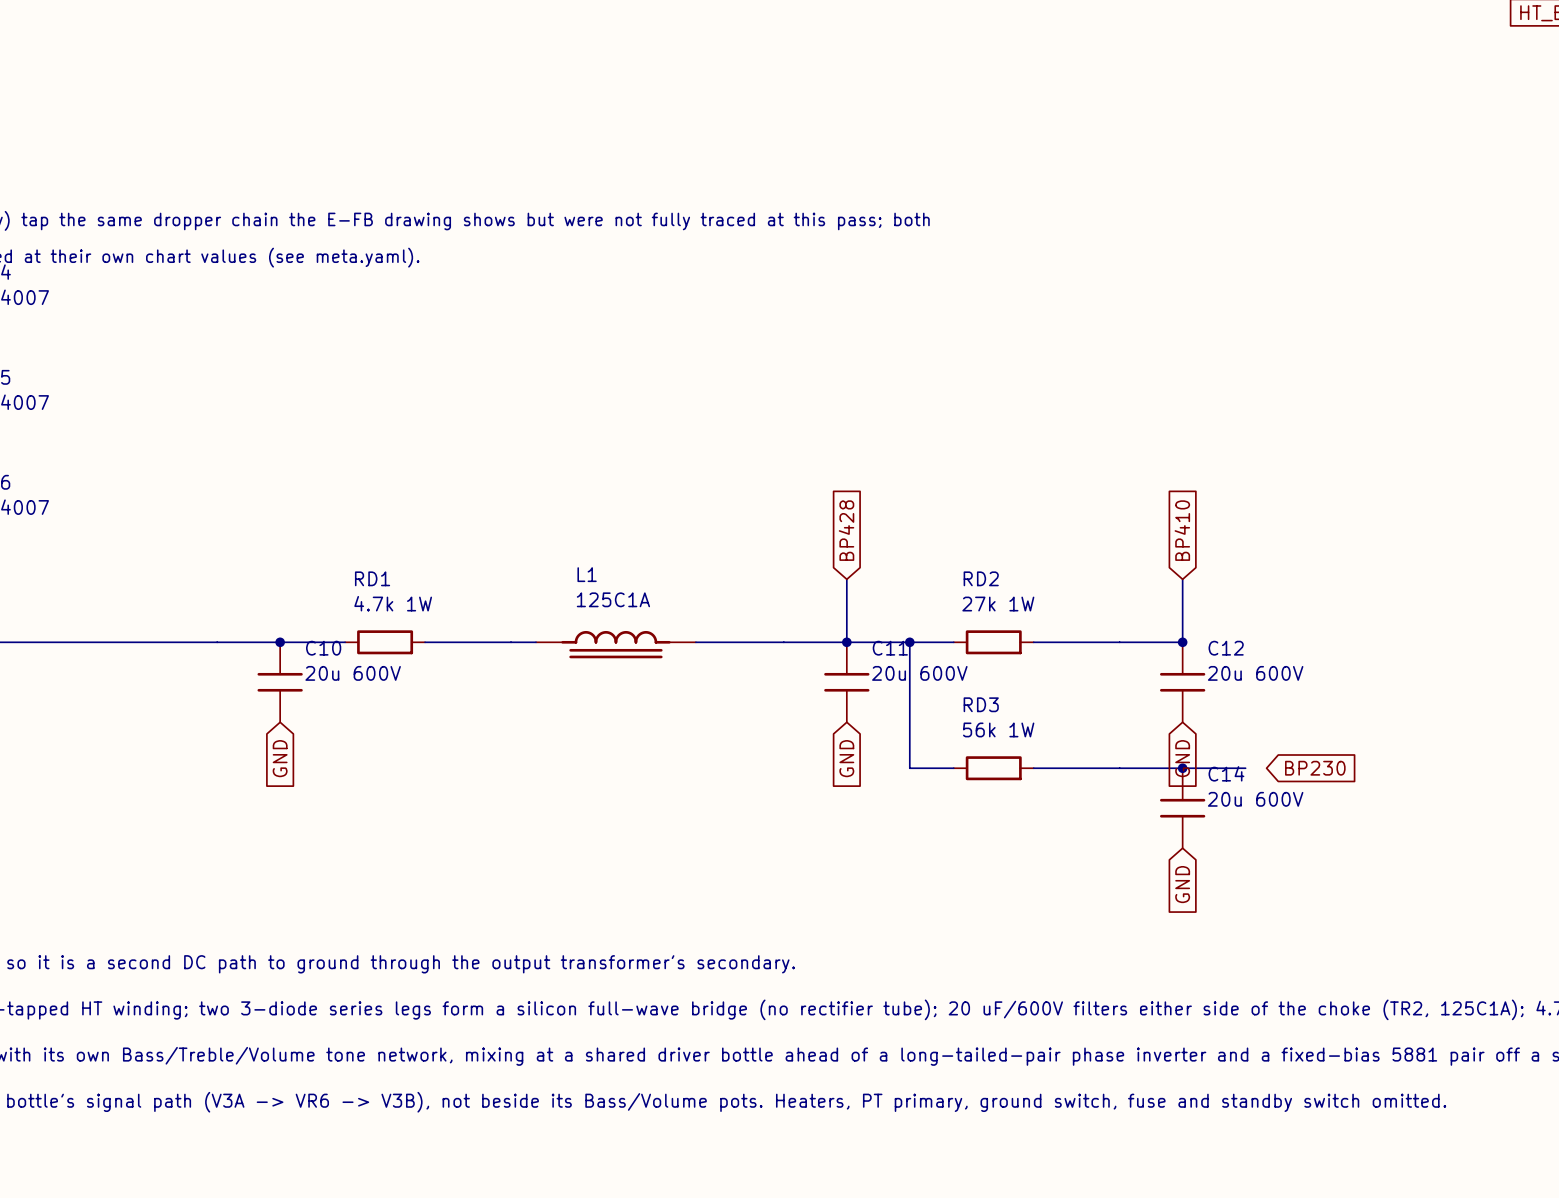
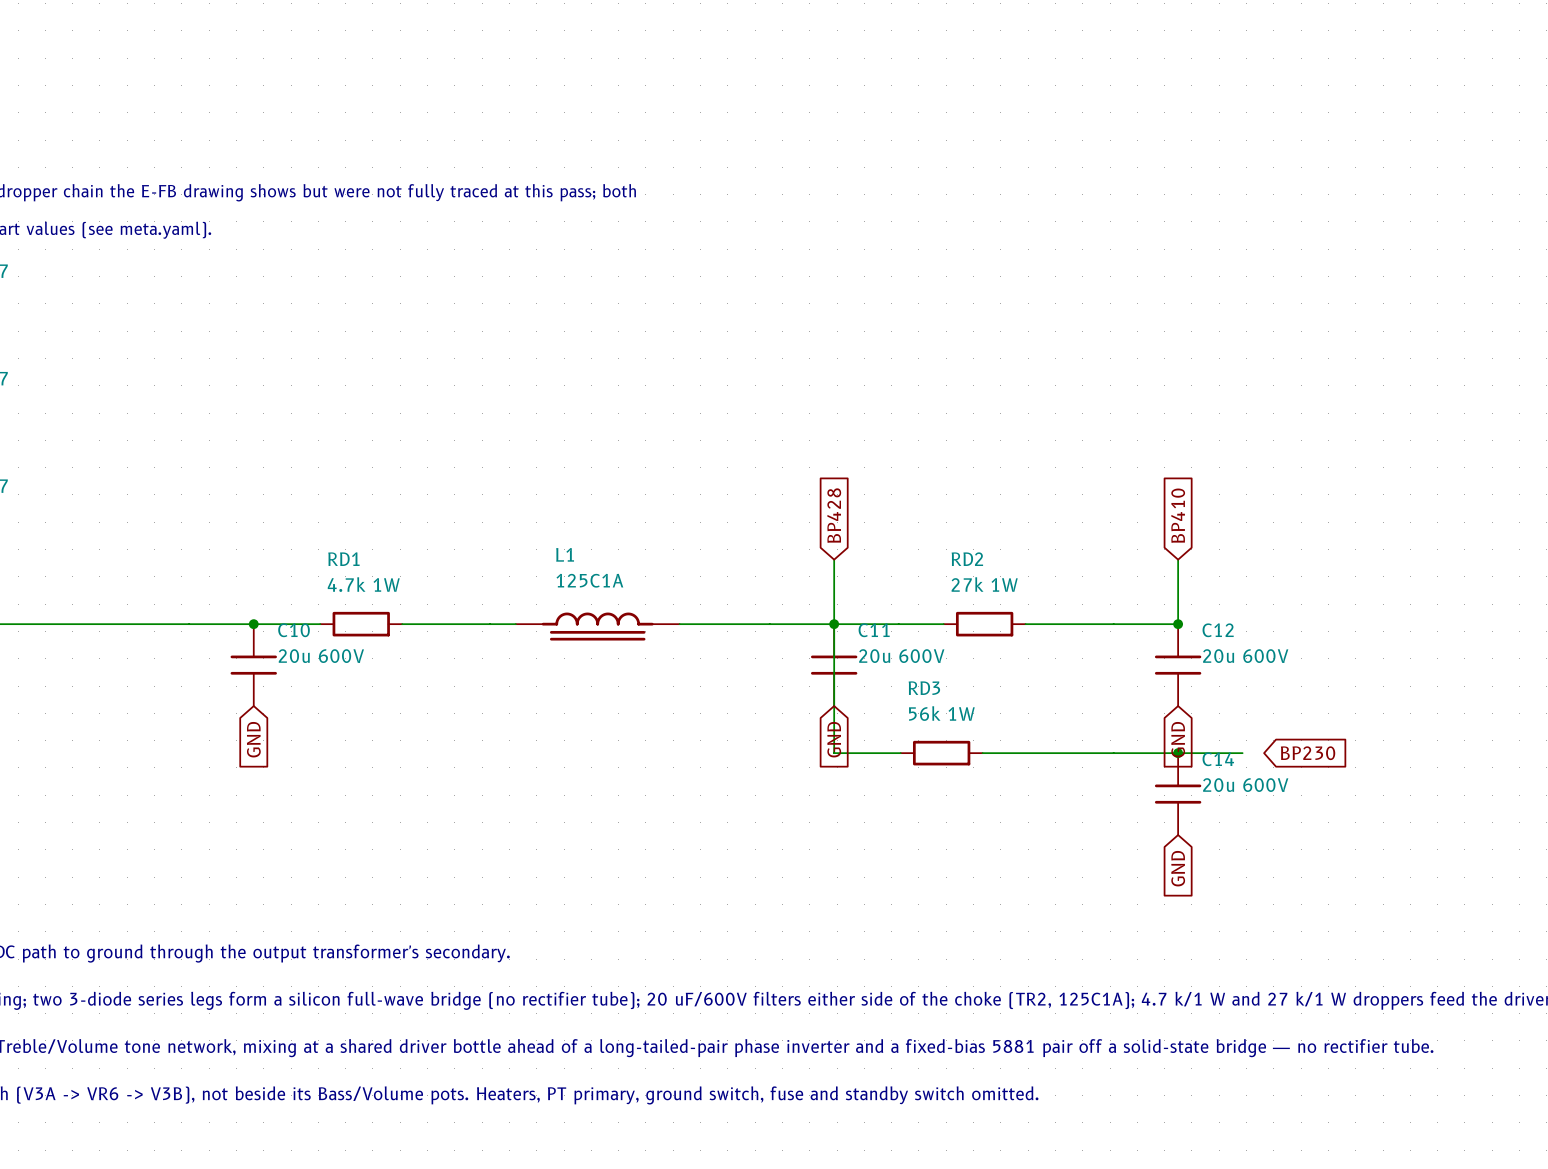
wire: (909, 642) (909, 768) -> (834, 624) (834, 753) (898, 753)
junction: (909, 642) -> none
wire: (911, 768) (953, 768) -> (982, 753) (1025, 753)
RD3 position: (993, 768) -> (941, 753)

